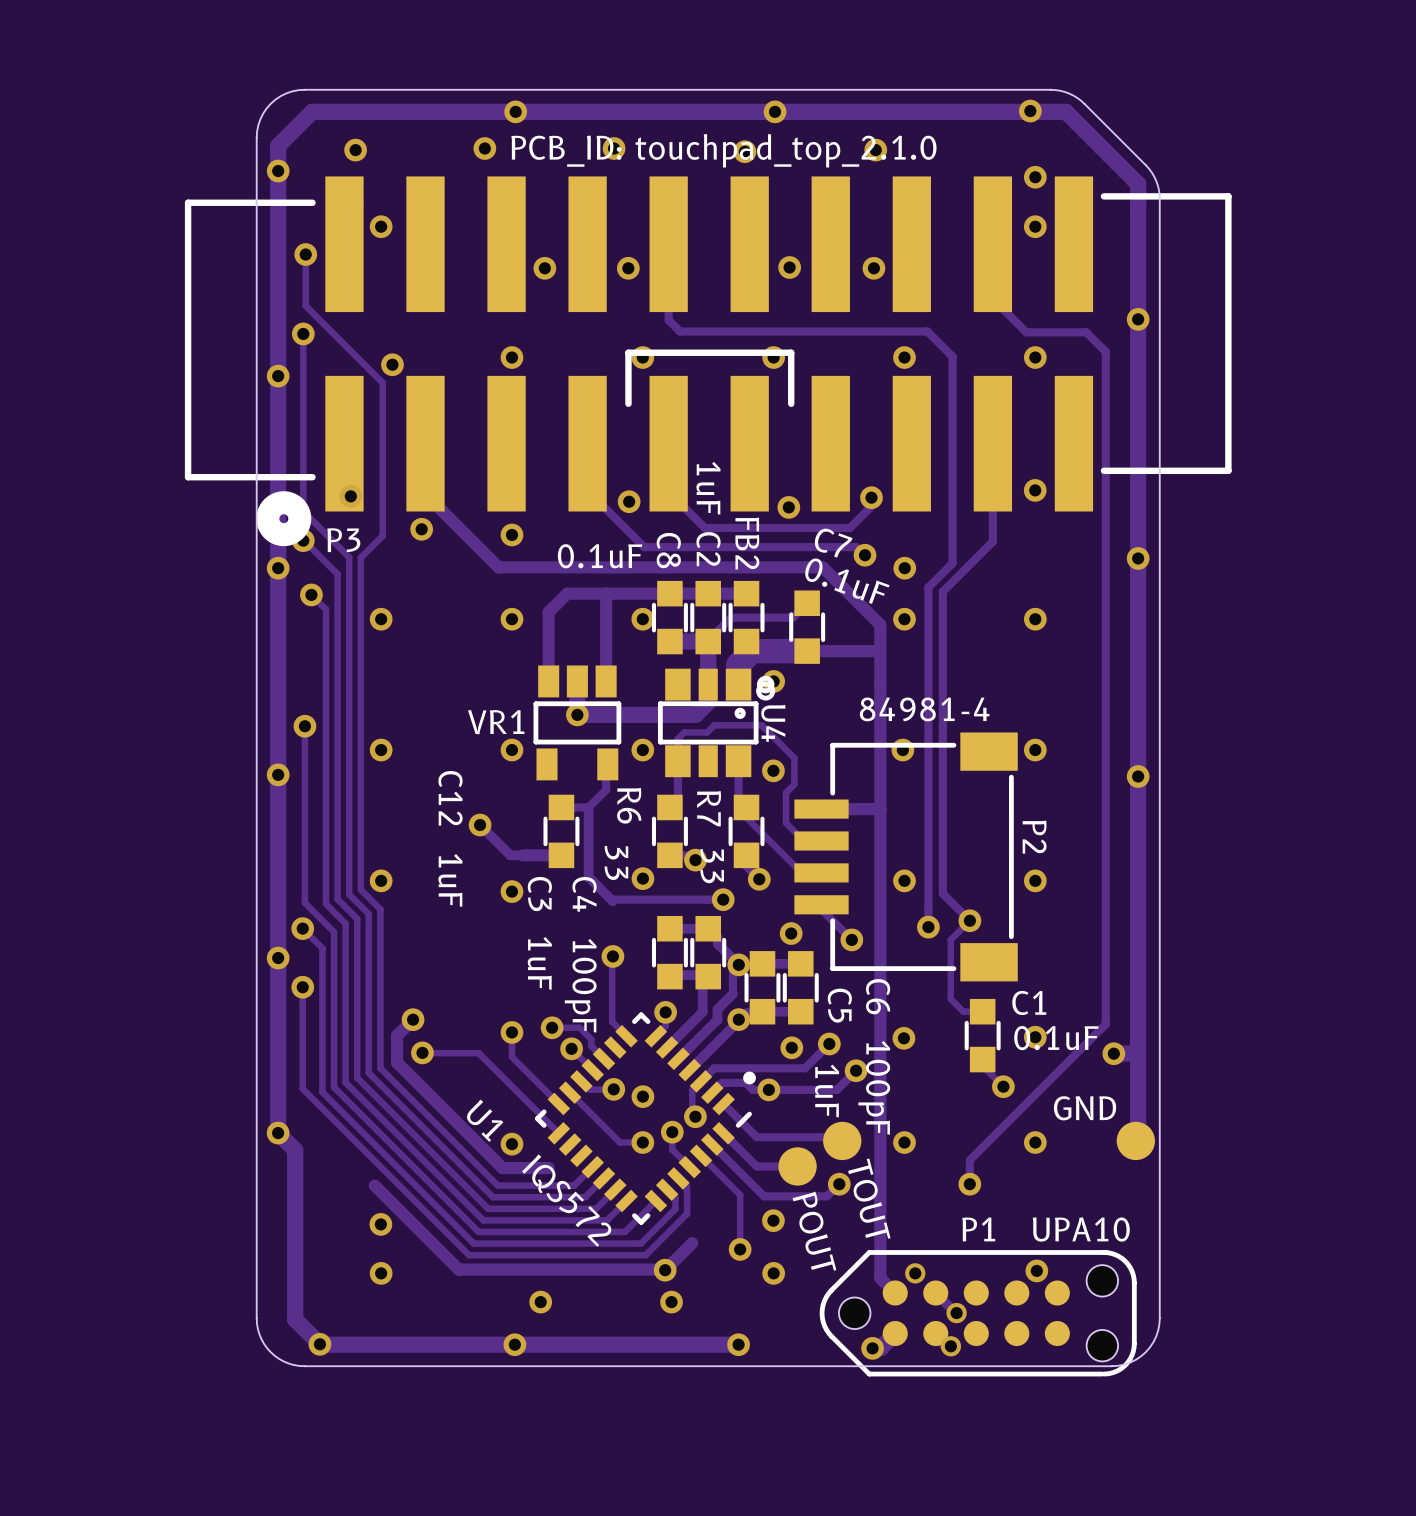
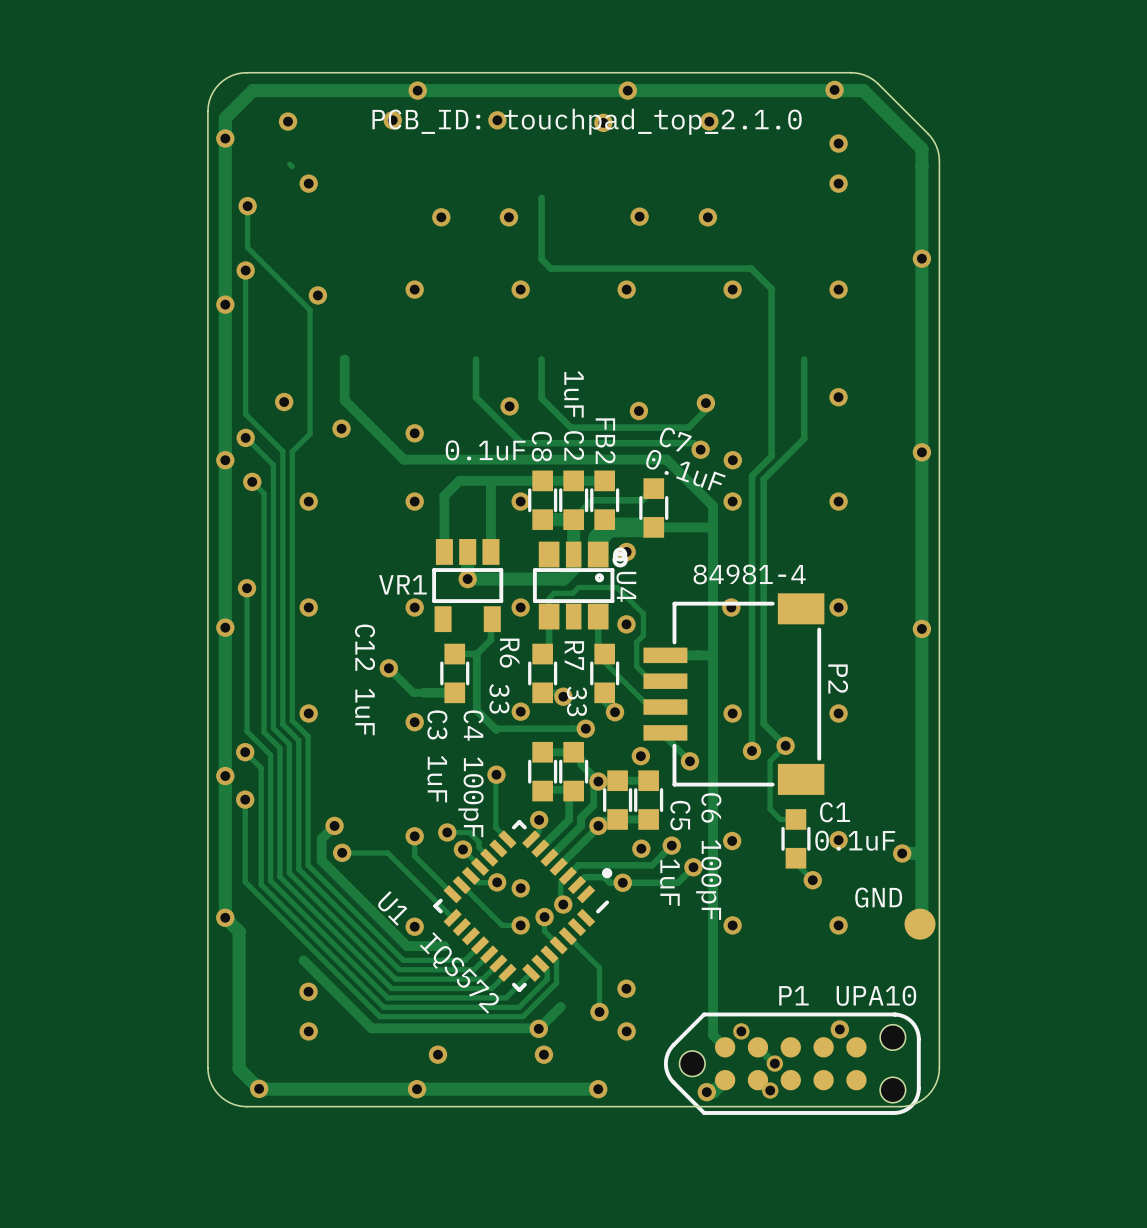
track: (992, 244) (992, 298) (1026, 332) (1086, 332) (1105, 351) (1105, 1024) (969, 1160) (969, 1184) -> none
P3: (708, 361) -> none
track: (723, 1103) (756, 1137) (838, 1137) (842, 1140) -> none
track: (723, 1133) (756, 1166) (797, 1166) -> none
part: TOUT (842, 1140) -> none
track: (712, 1144) (764, 1196) (826, 1196) (839, 1184) -> none
part: POUT (797, 1166) -> none
via: (839, 1184) -> none
via: (969, 1184) -> none

